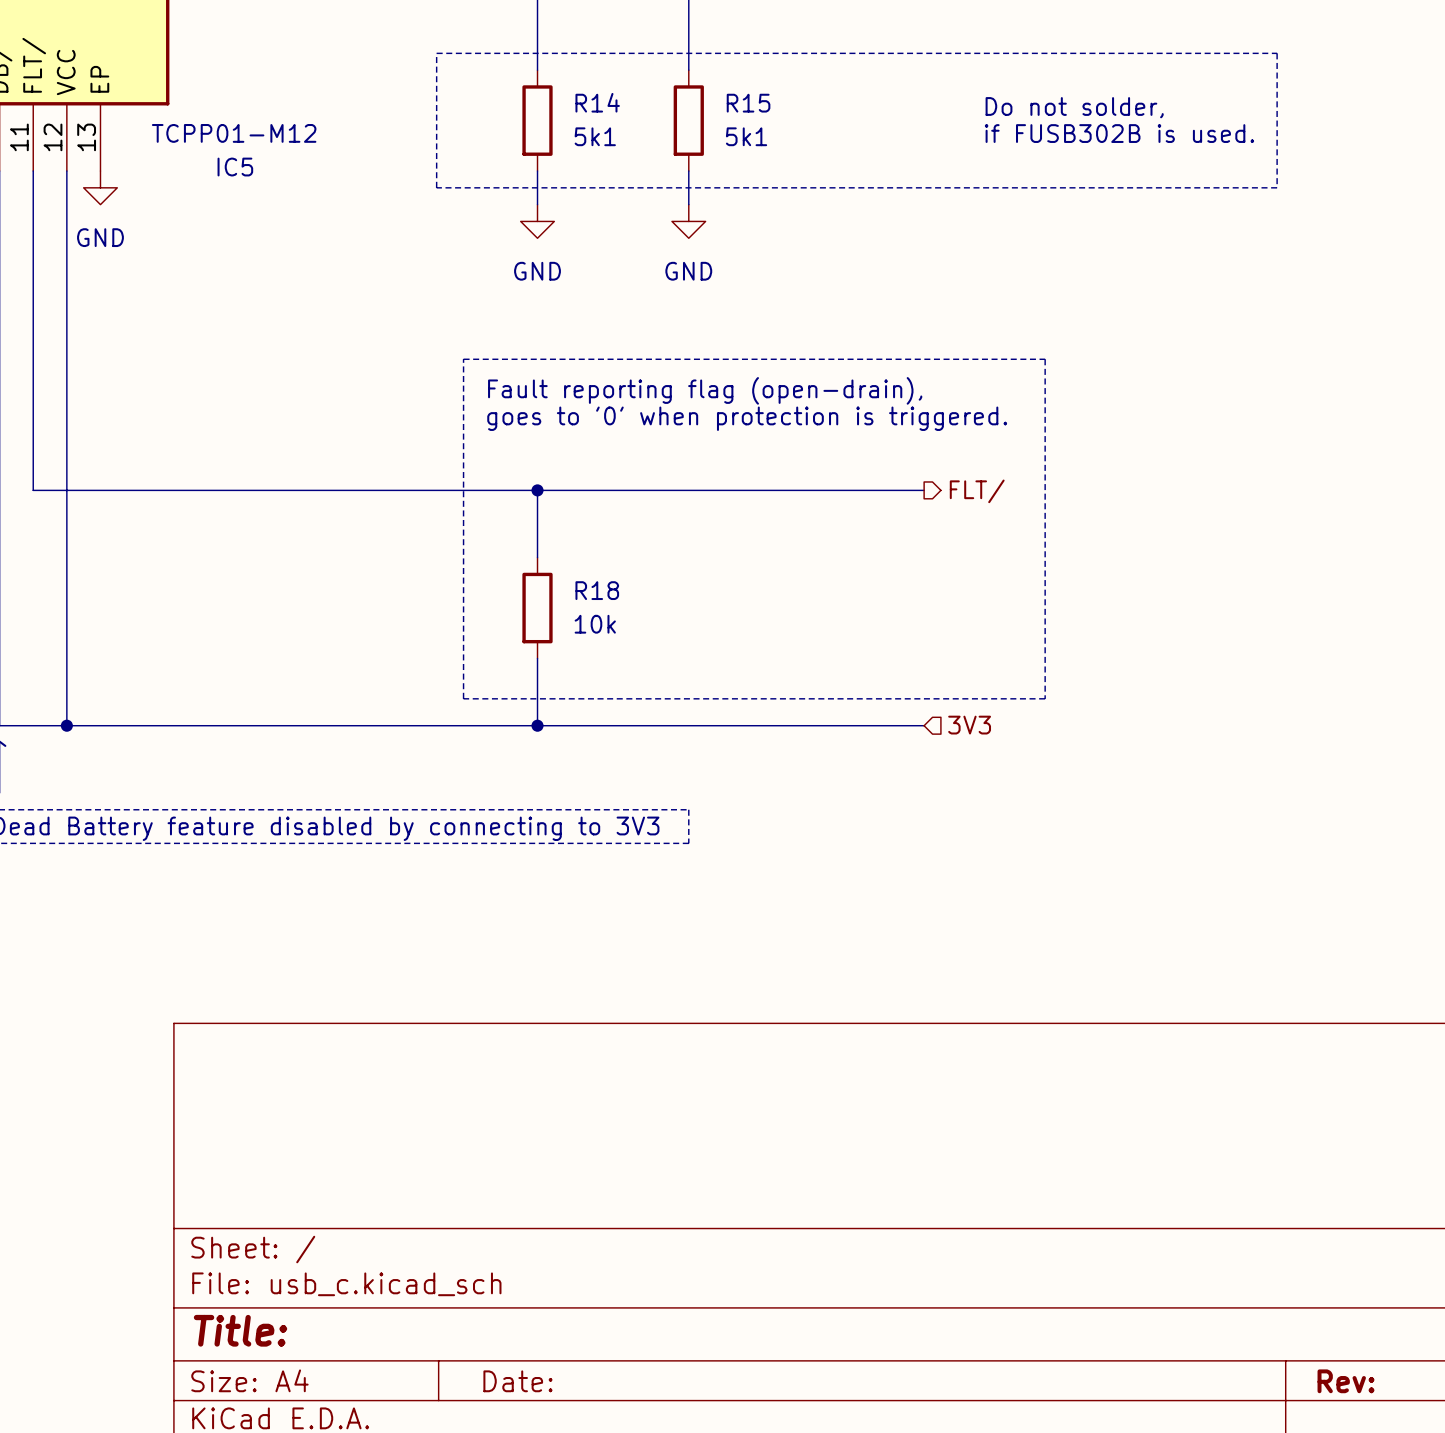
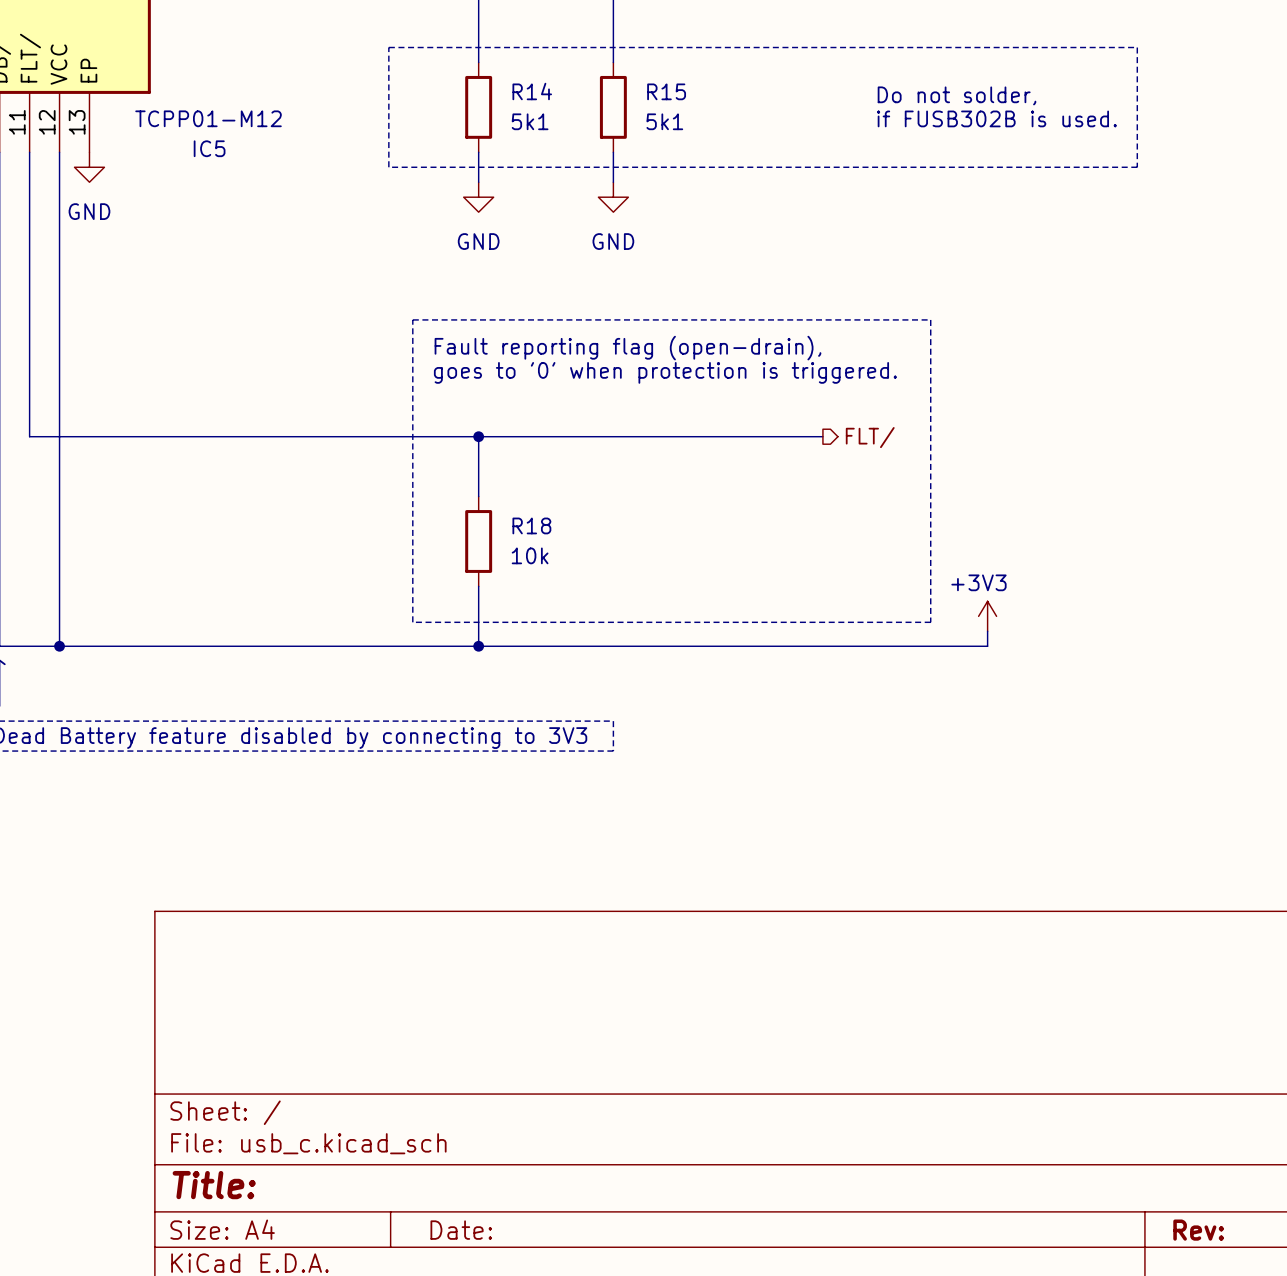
power symbol: none -> +3V3 (987, 616)
wire: none -> (987, 631) (987, 646) (822, 646)
hierarchical label: 3V3 (969, 725) -> none

